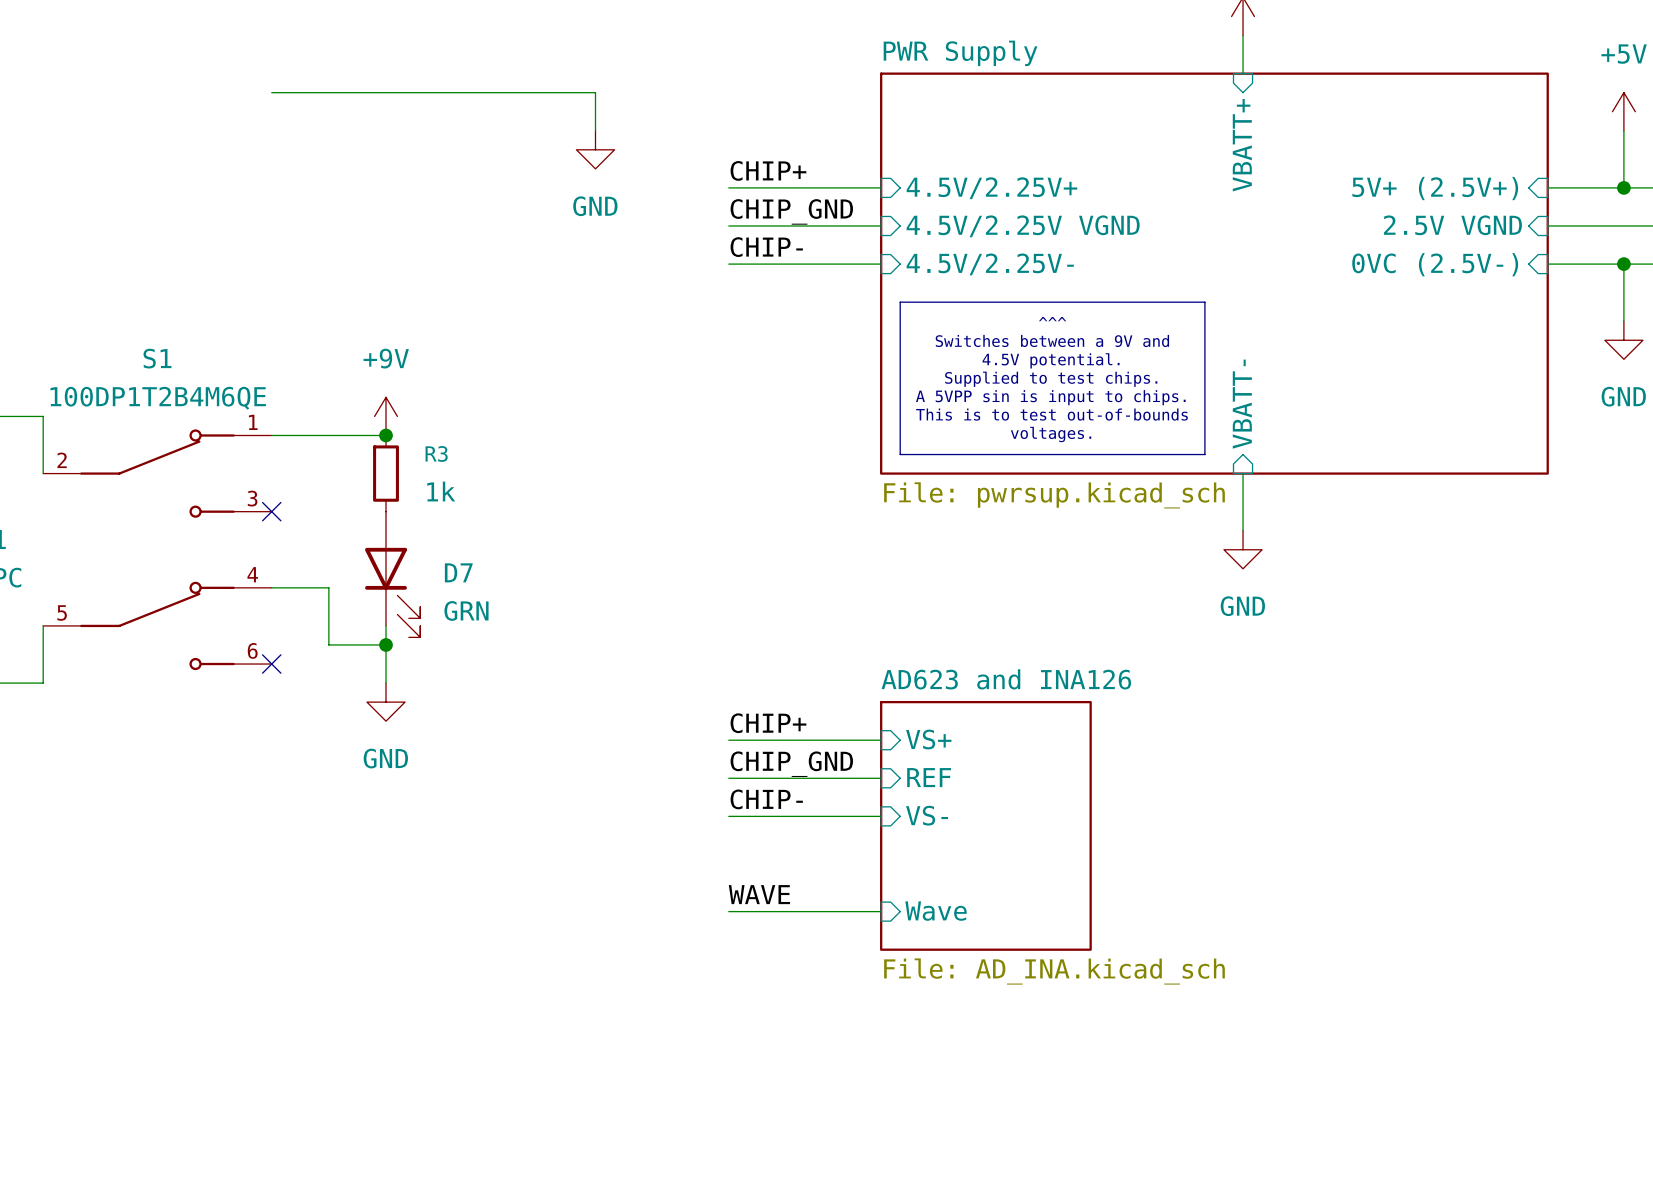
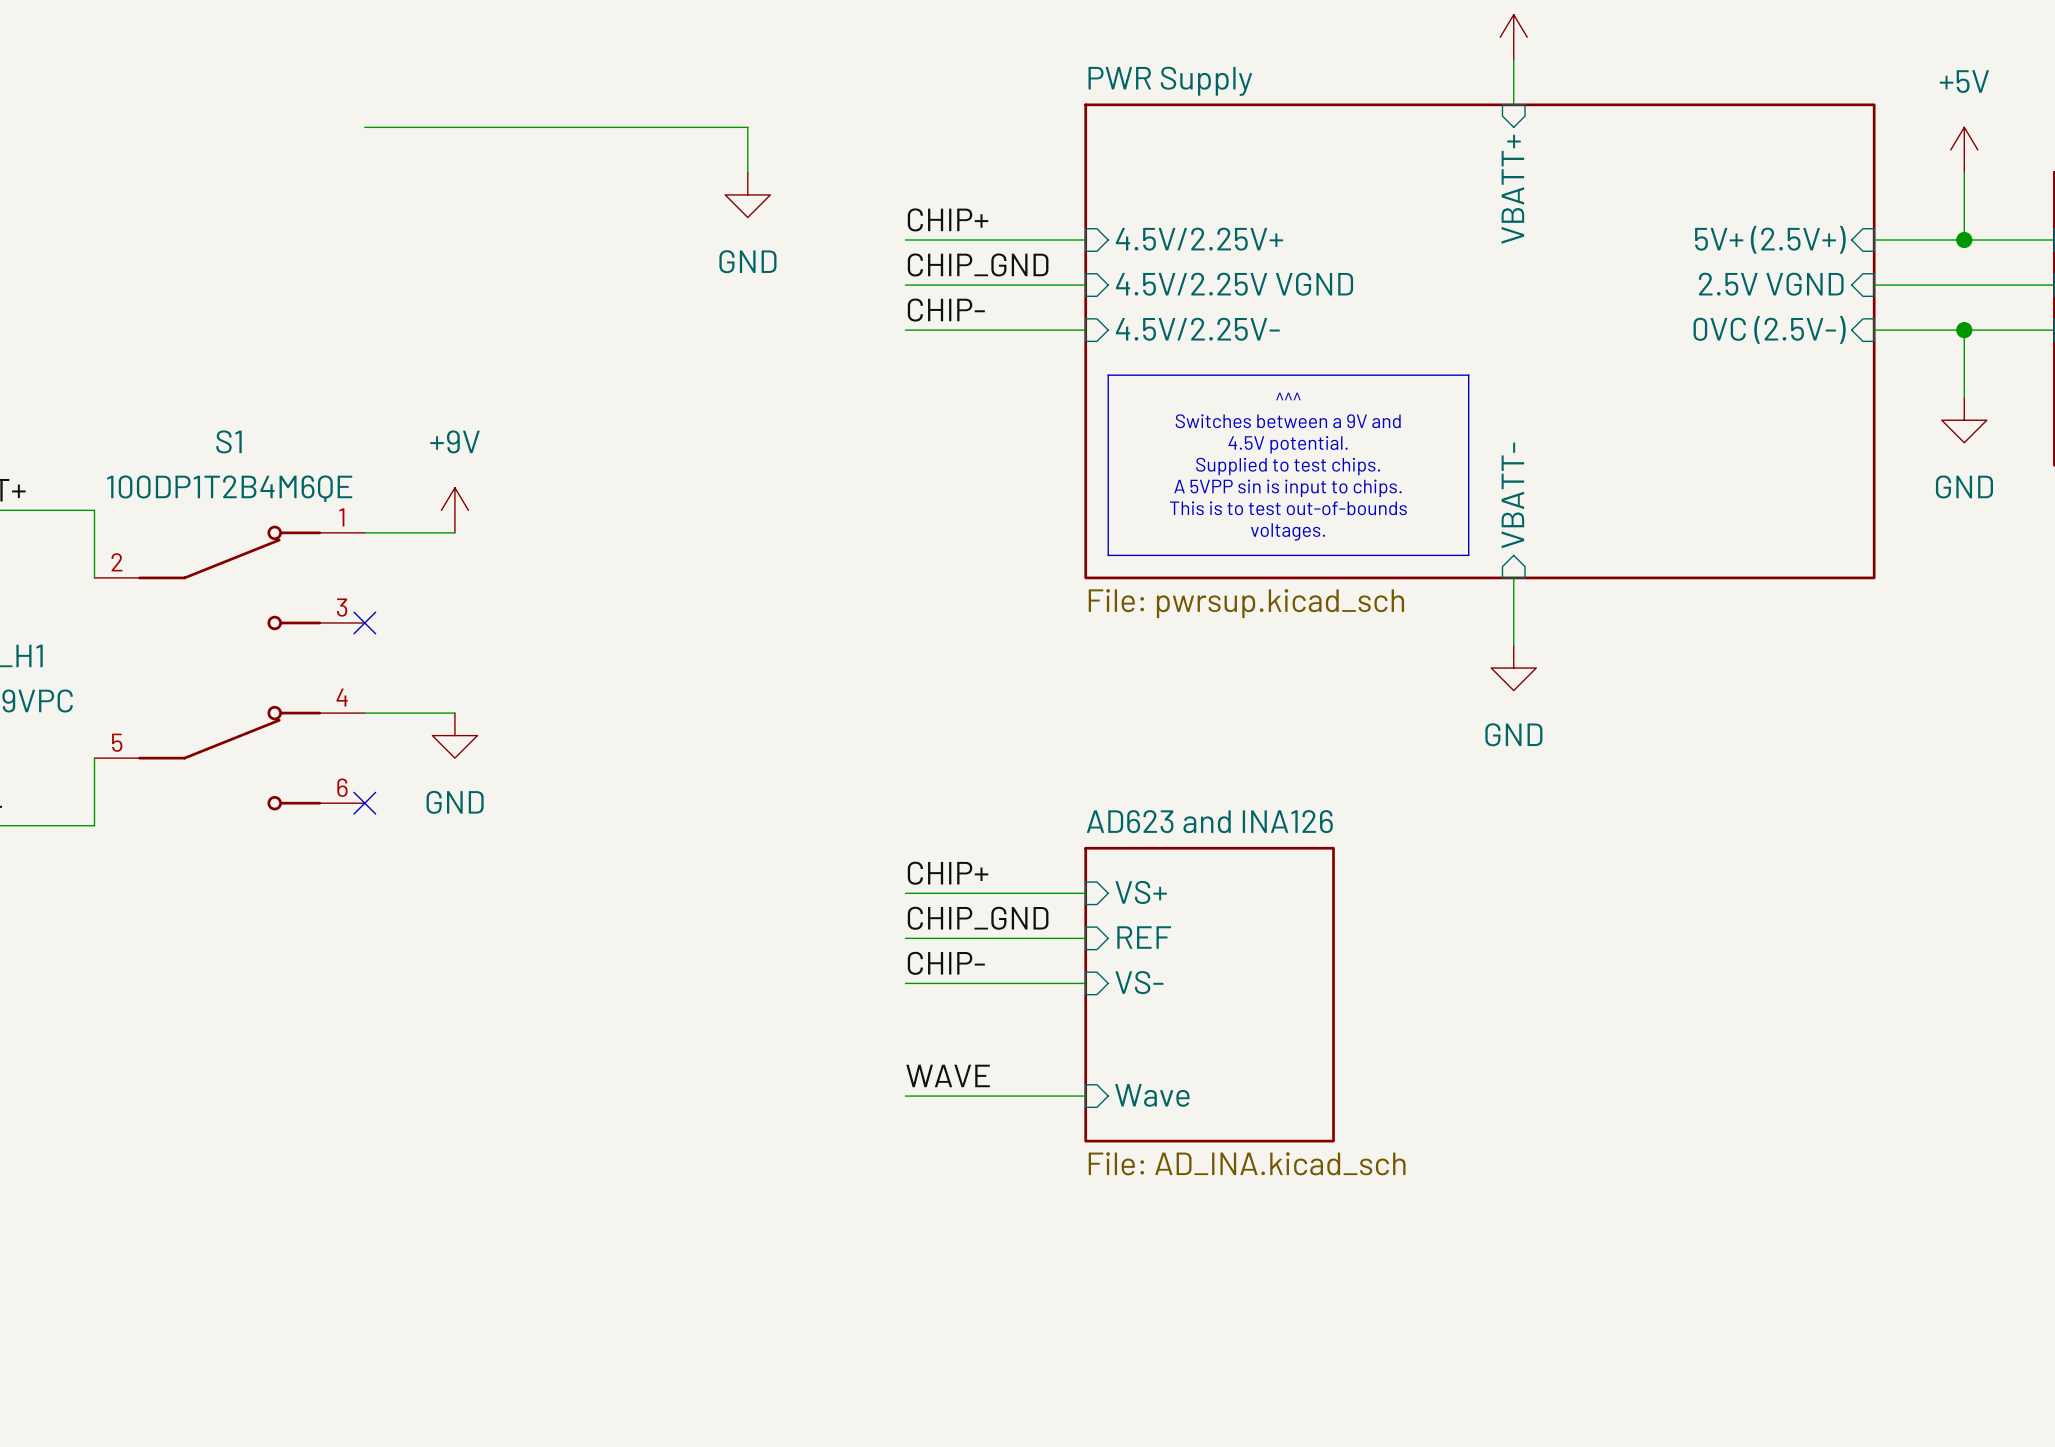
power symbol position: +9V (386, 416) -> +9V (454, 510)
wire: (347, 435) (386, 435) -> none
junction: (386, 435) -> none
R3: 1k (386, 473) -> none
D7: GRN (392, 574) -> none
wire: (328, 587) (328, 644) (386, 644) -> (432, 713) (454, 713)
wire: (386, 625) (386, 683) -> none
junction: (386, 644) -> none
power symbol position: GND (386, 702) -> GND (454, 735)

